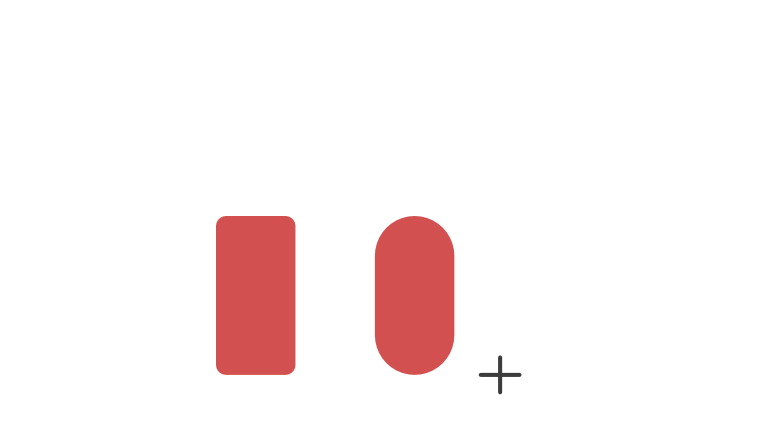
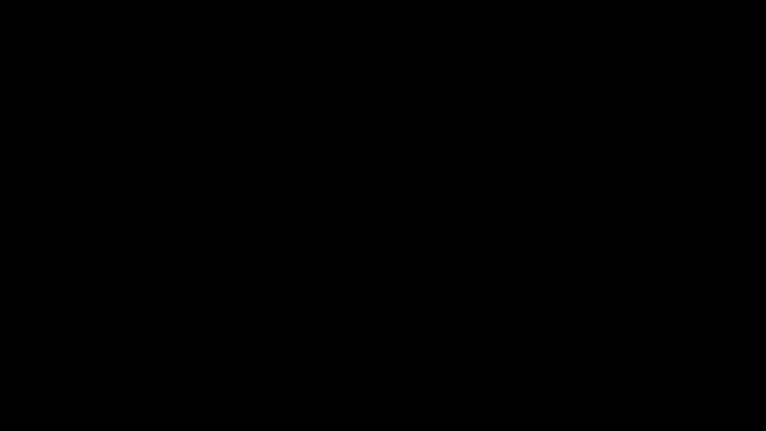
part: (335, 295) -> none

